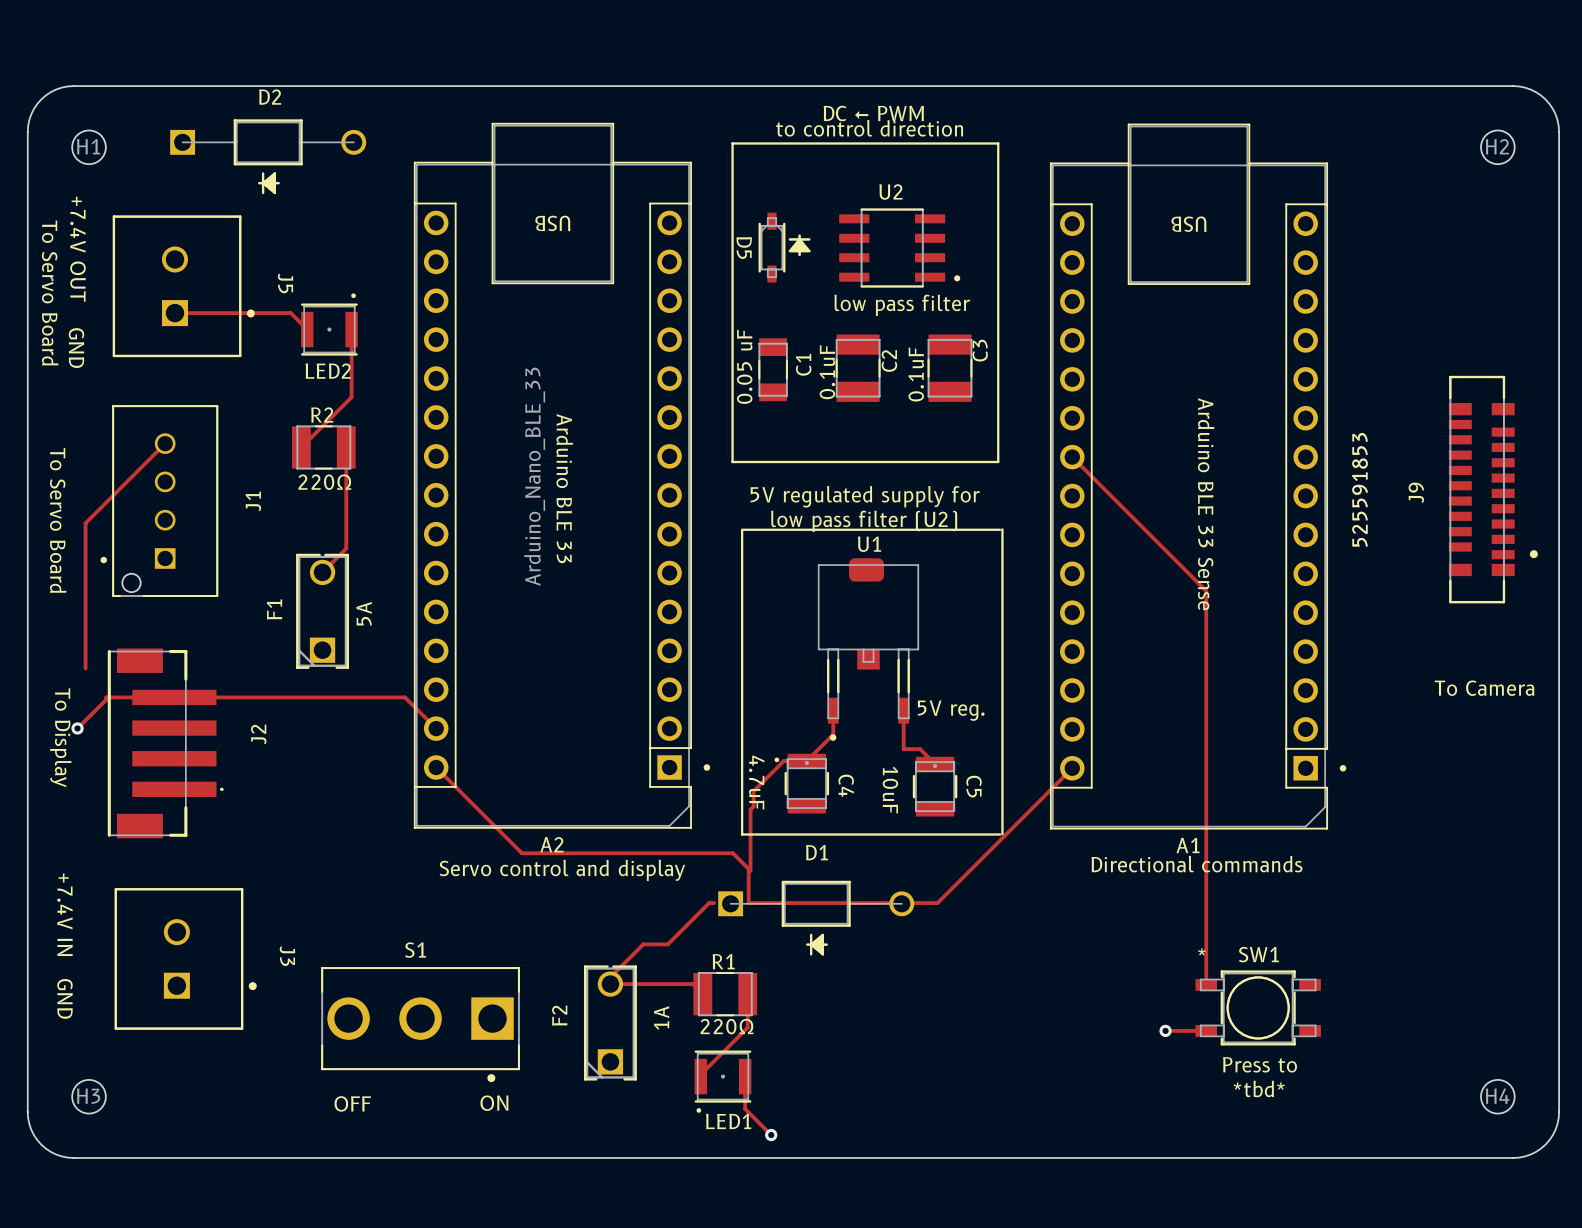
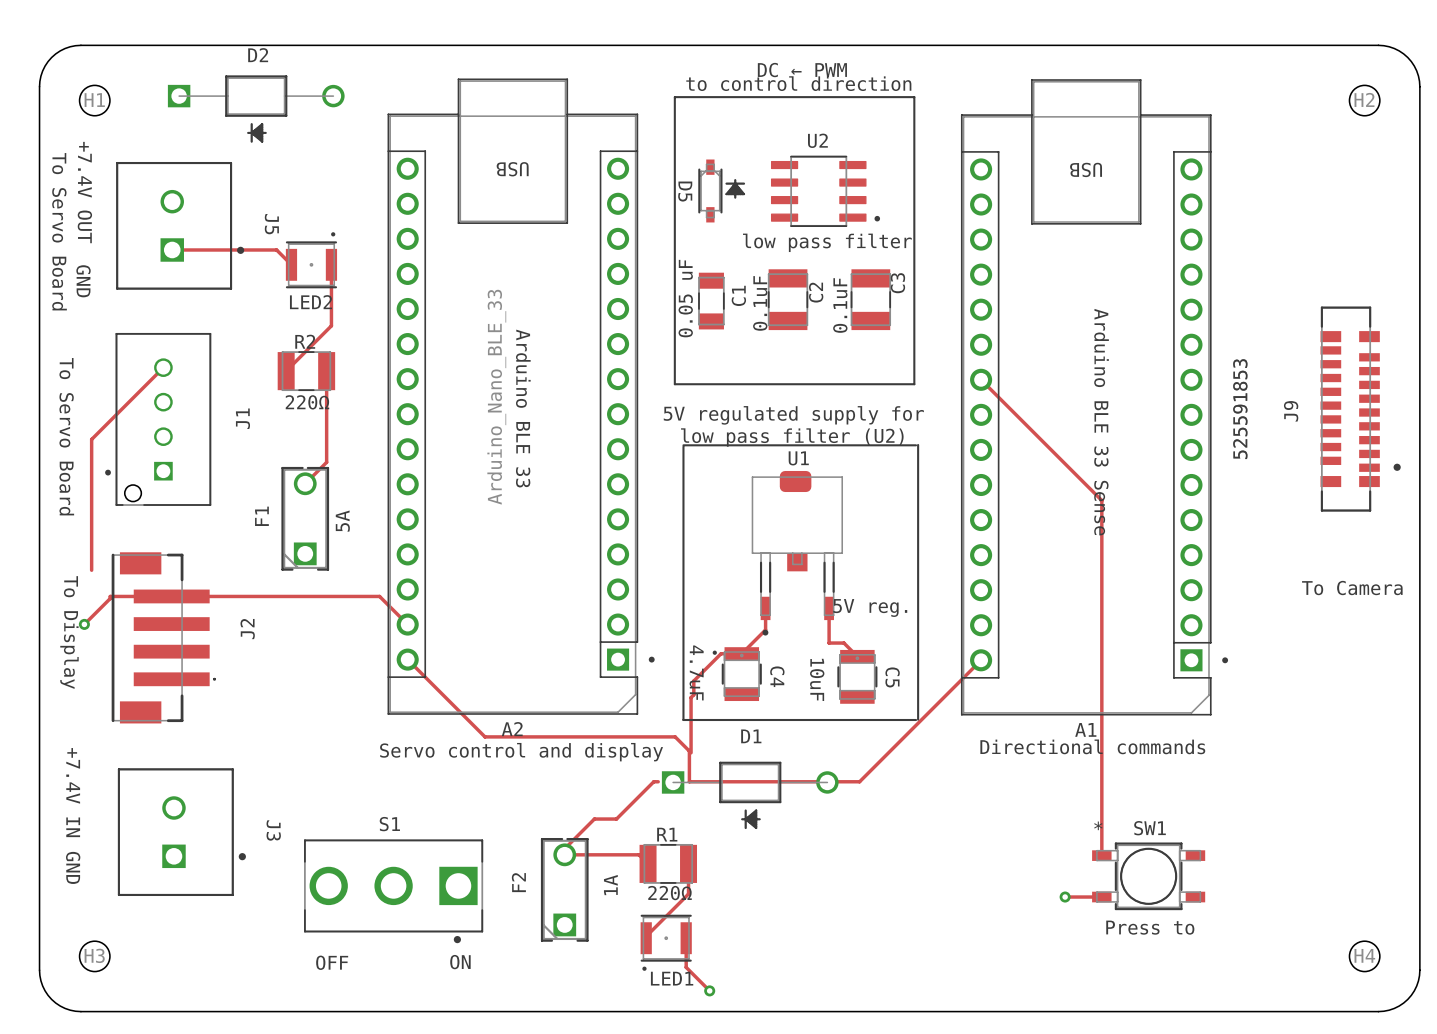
text: *tbd* (1259, 1088) -> none

